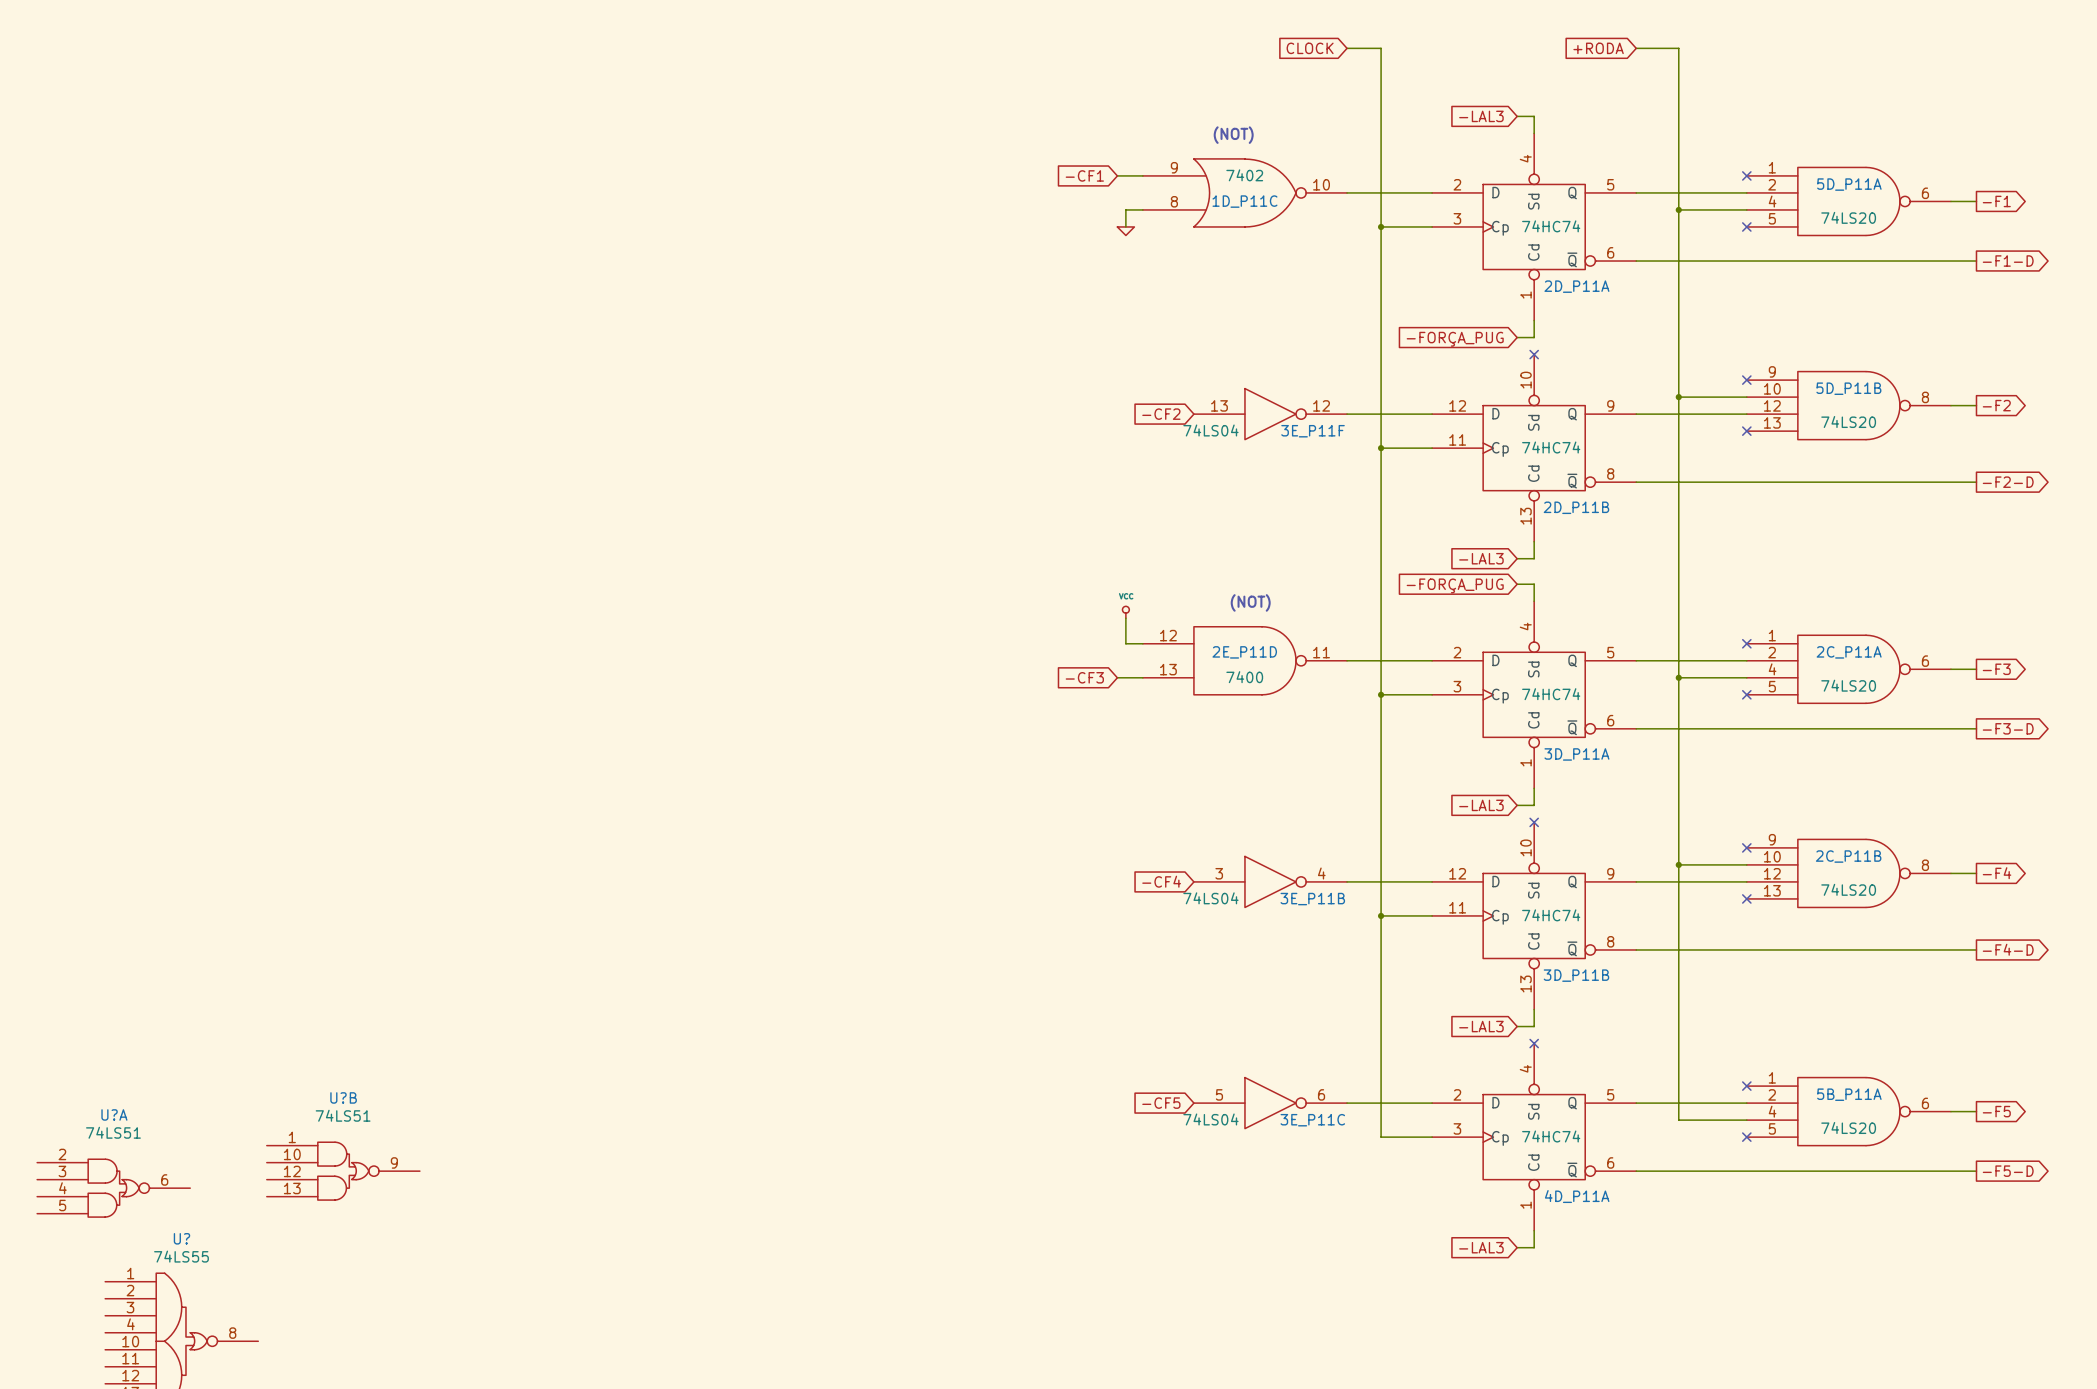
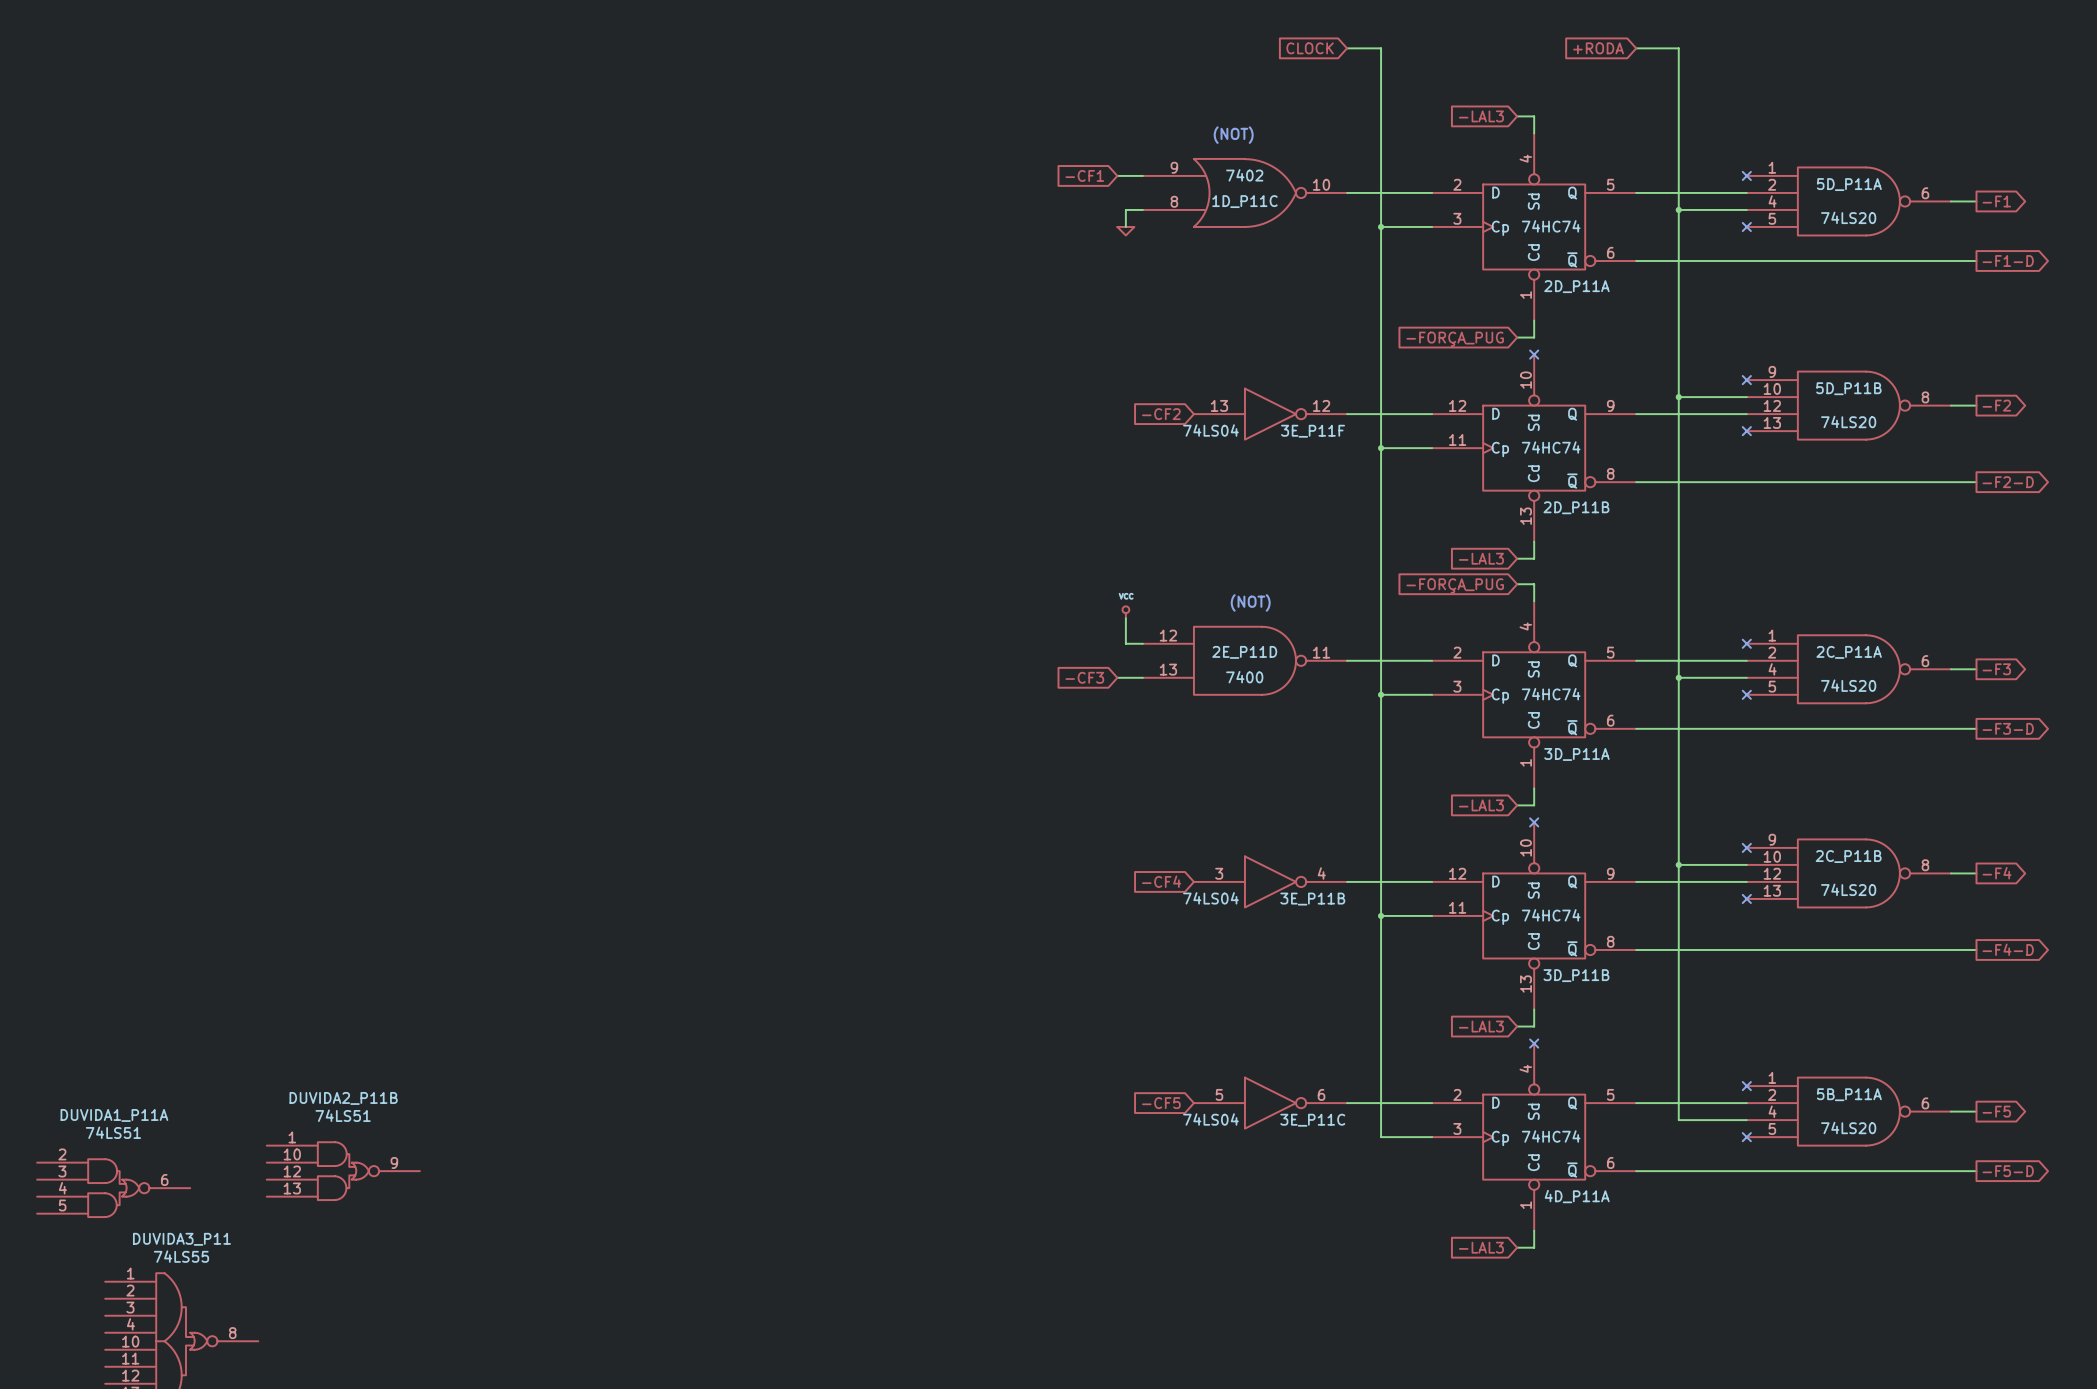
U?B name: U?B (343, 1097) -> DUVIDA2_P11B (343, 1098)
U?A name: U?A (114, 1114) -> DUVIDA1_P11A (114, 1115)
U? name: U? (181, 1238) -> DUVIDA3_P11 (181, 1239)

